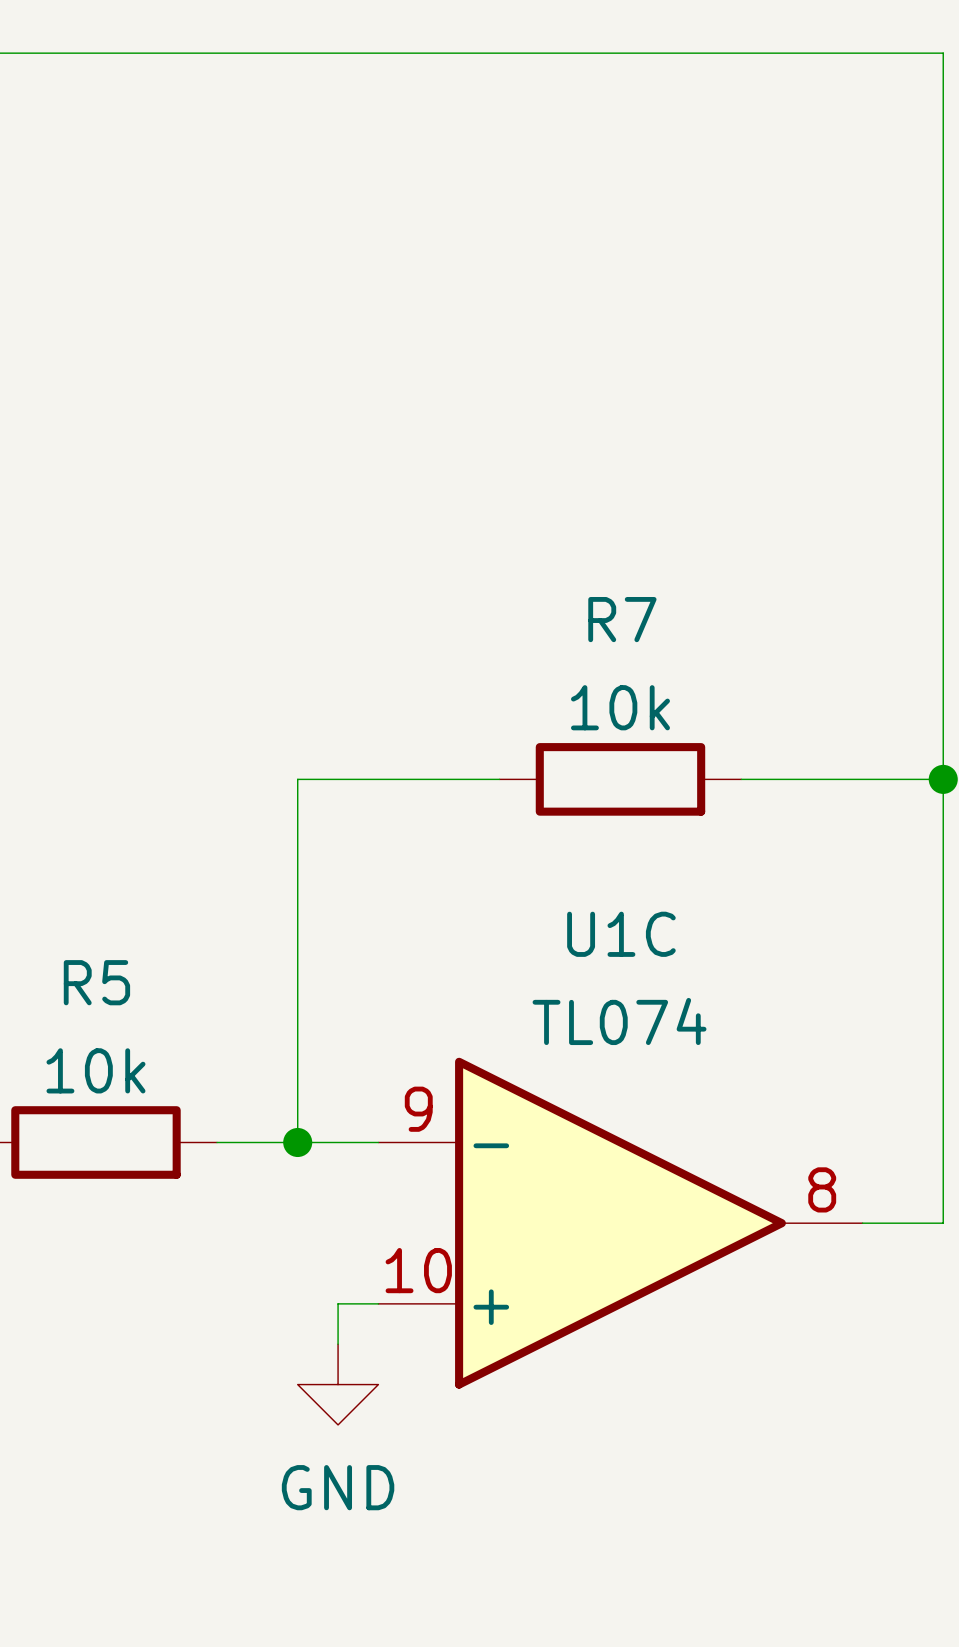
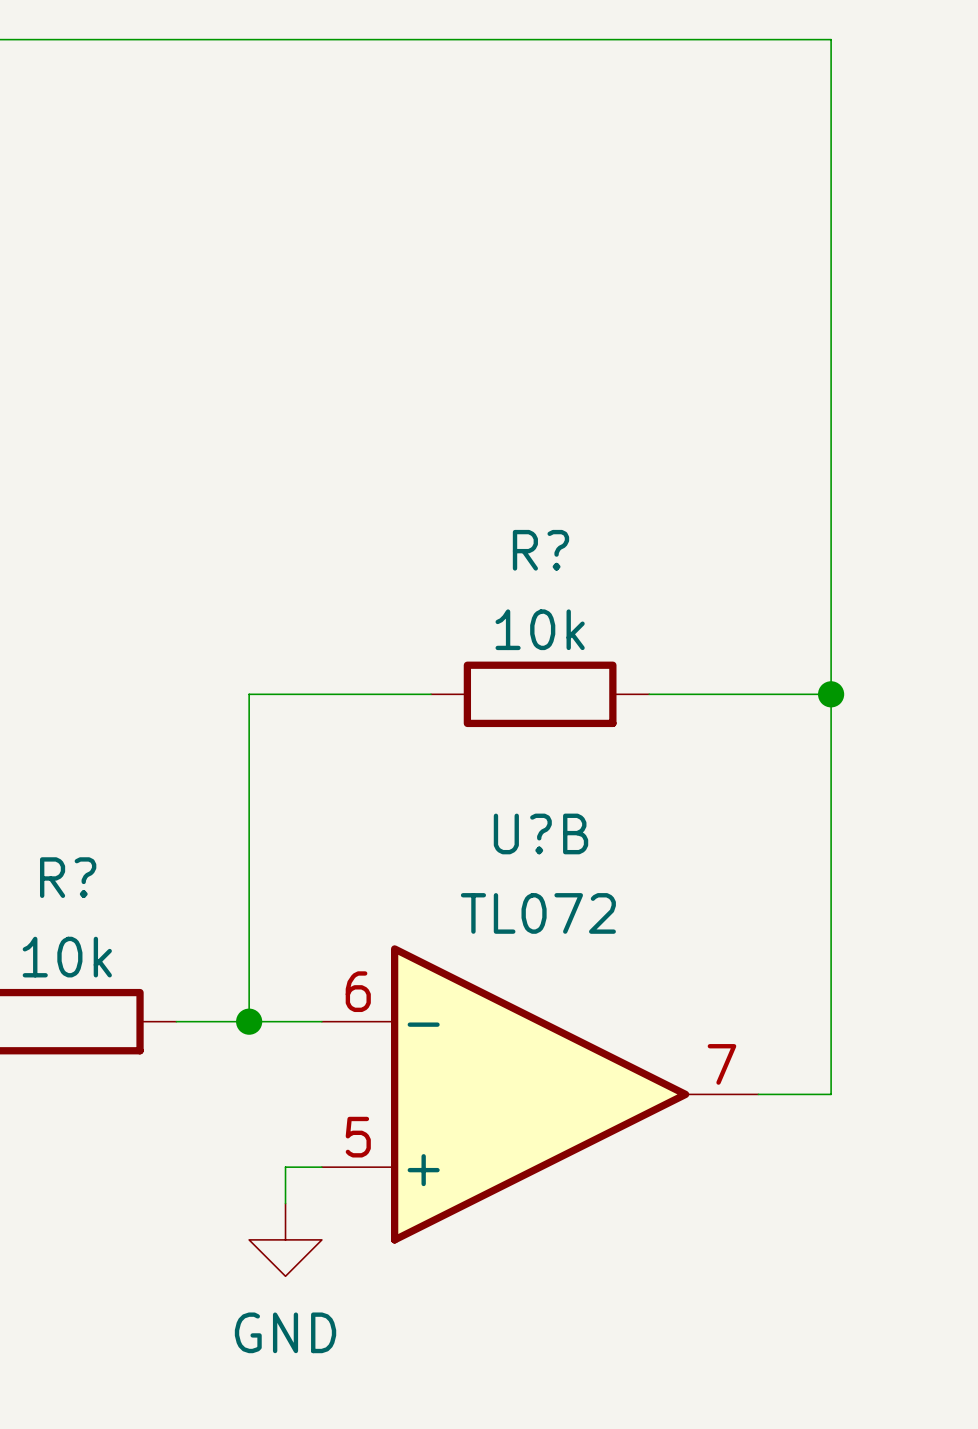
R7 name: R7 (622, 619) -> R? (540, 550)
U1C name: U1C (621, 934) -> U?B (540, 833)
R5 name: R5 (96, 982) -> R? (68, 877)
U1C value: TL074 (619, 1021) -> TL072 (538, 913)
U1C pin number: 9 (418, 1109) -> 6 (358, 991)
U1C pin number: 8 (822, 1189) -> 7 (721, 1064)
U1C pin number: 10 (418, 1270) -> 5 (358, 1137)

